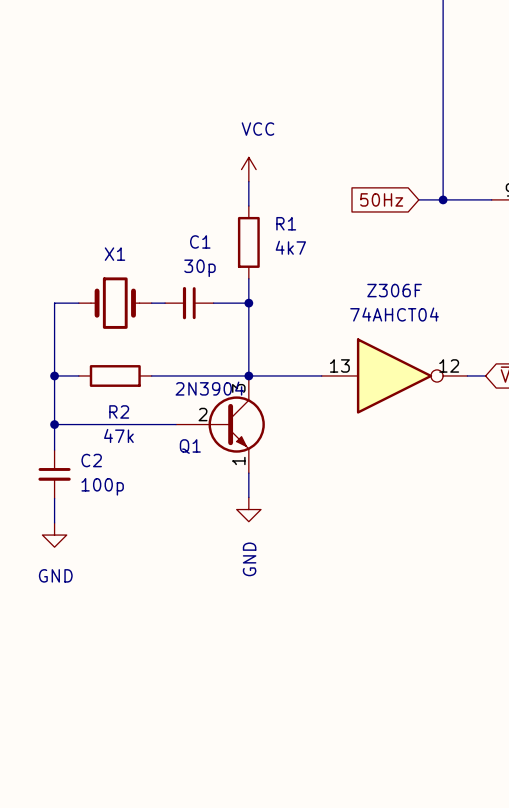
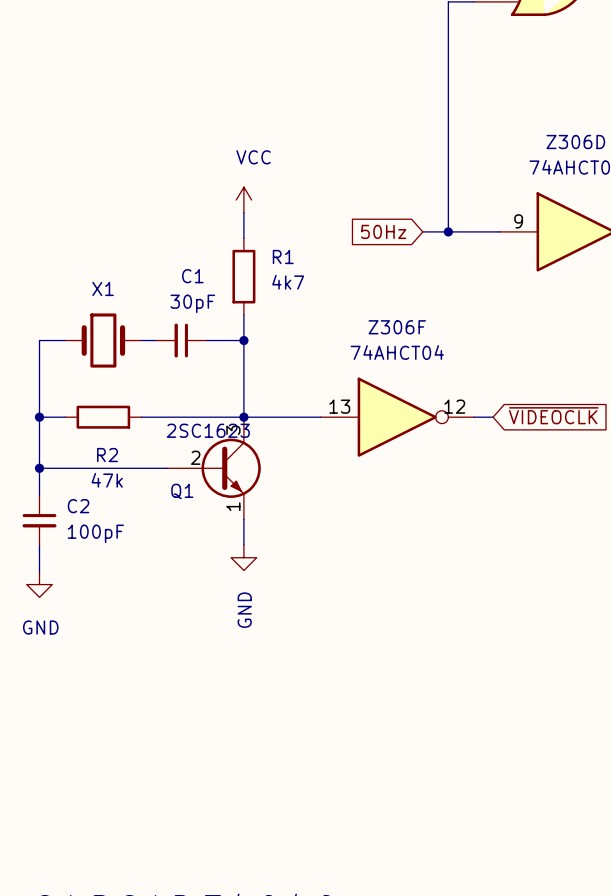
C1 value: 30p (199, 268) -> 30pF (192, 303)
Q1 value: 2N3904 (209, 388) -> 2SC1623 (208, 430)
C2 value: 100p (102, 486) -> 100pF (95, 533)

